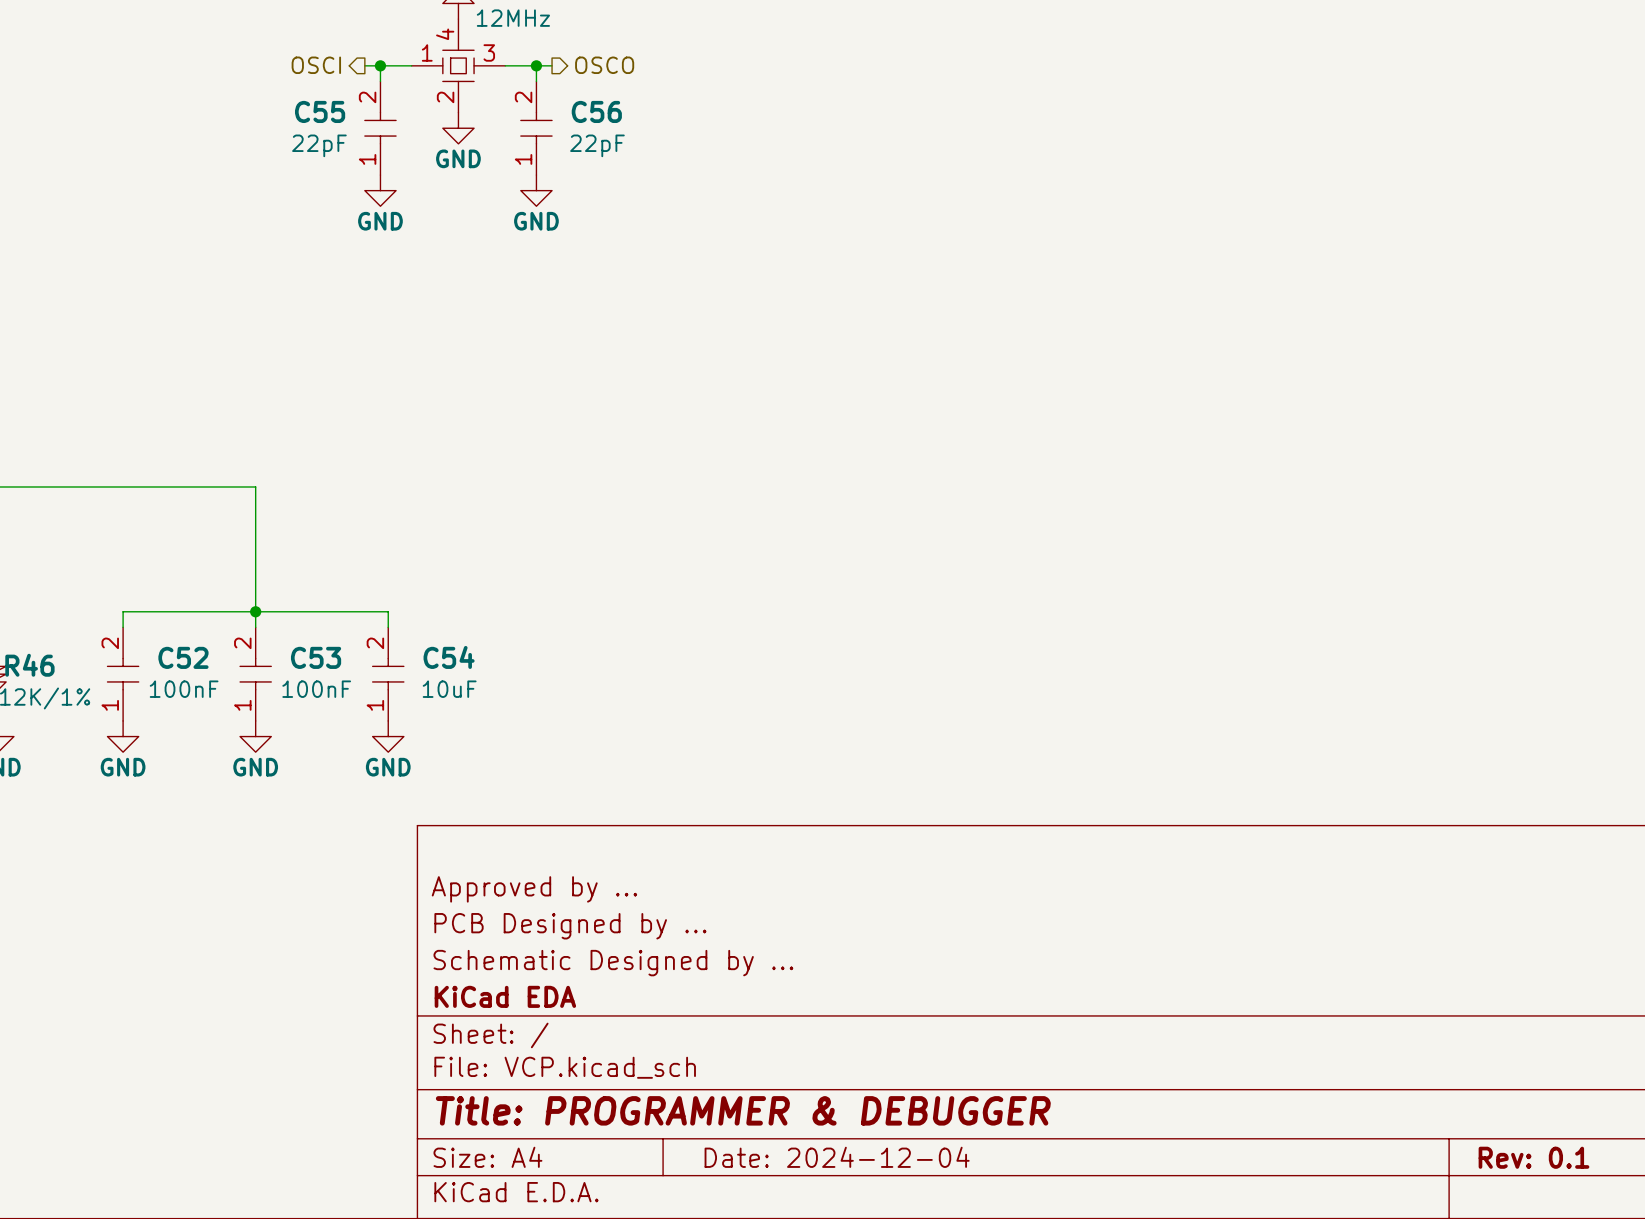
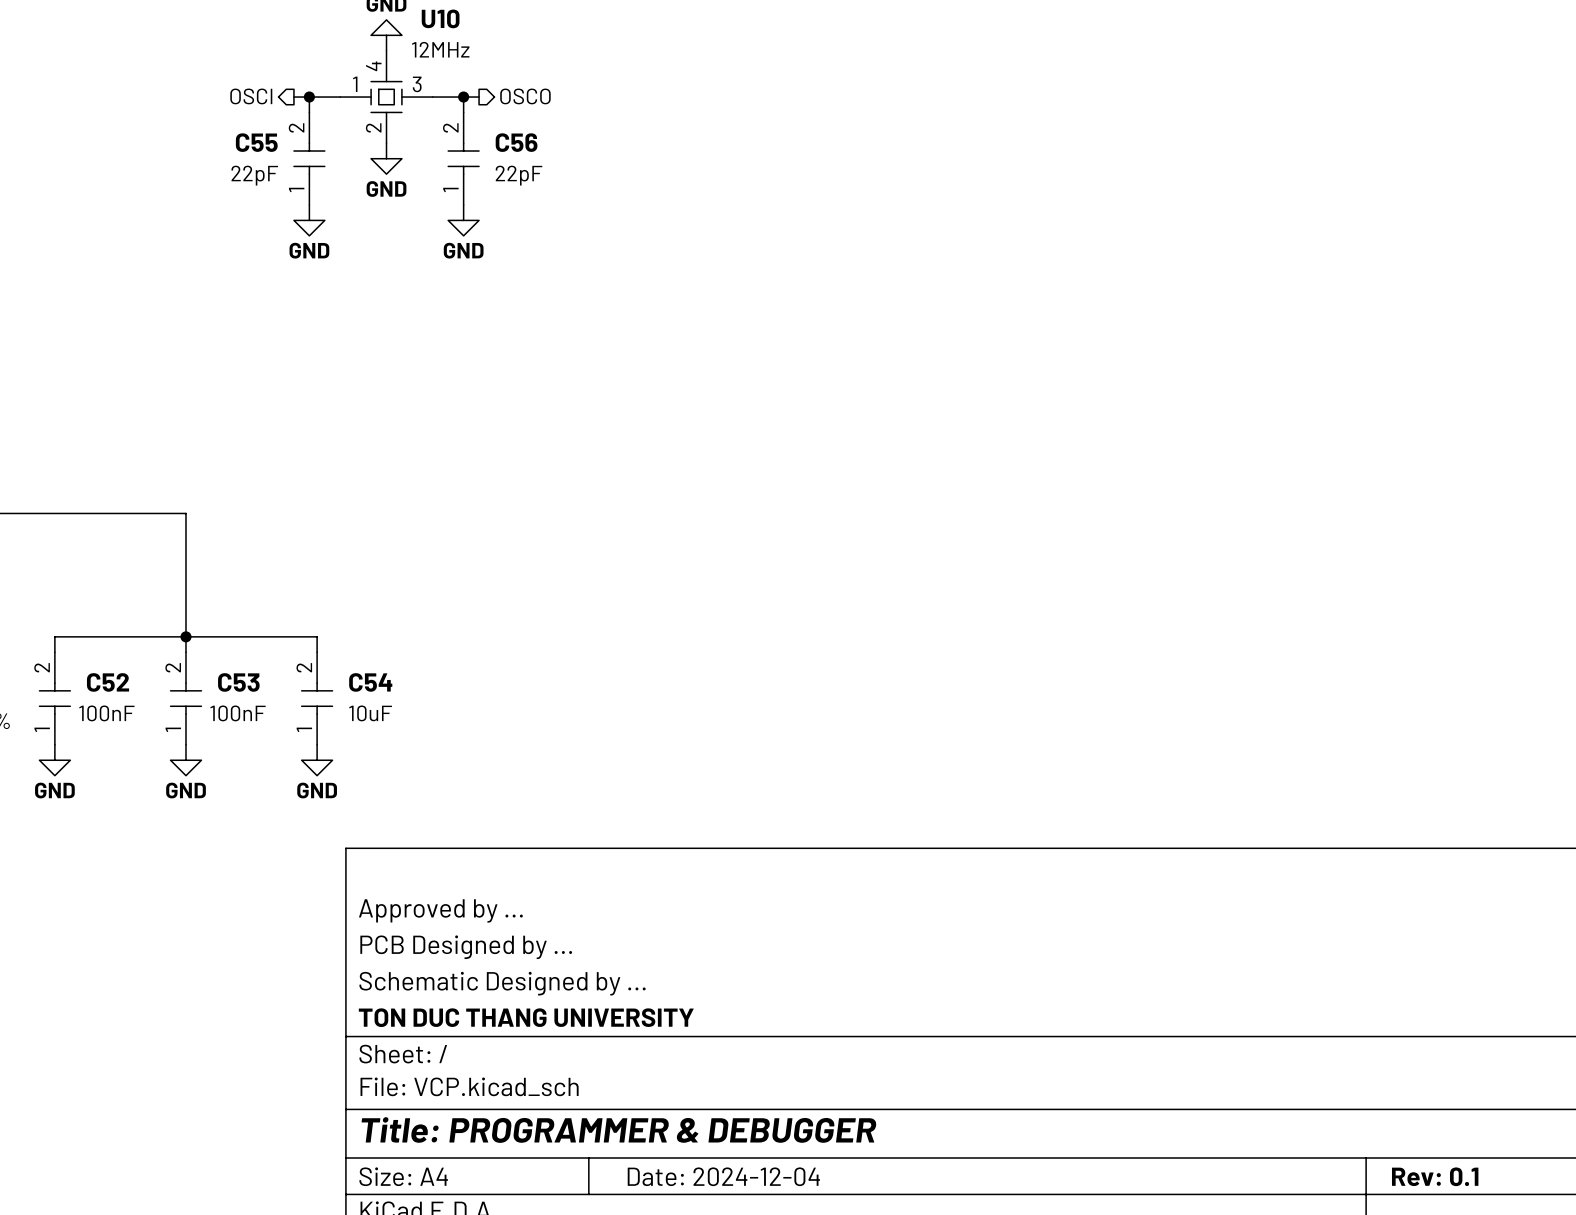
title block: KiCad EDA (505, 996) -> TON DUC THANG UNIVERSITY (526, 1017)

